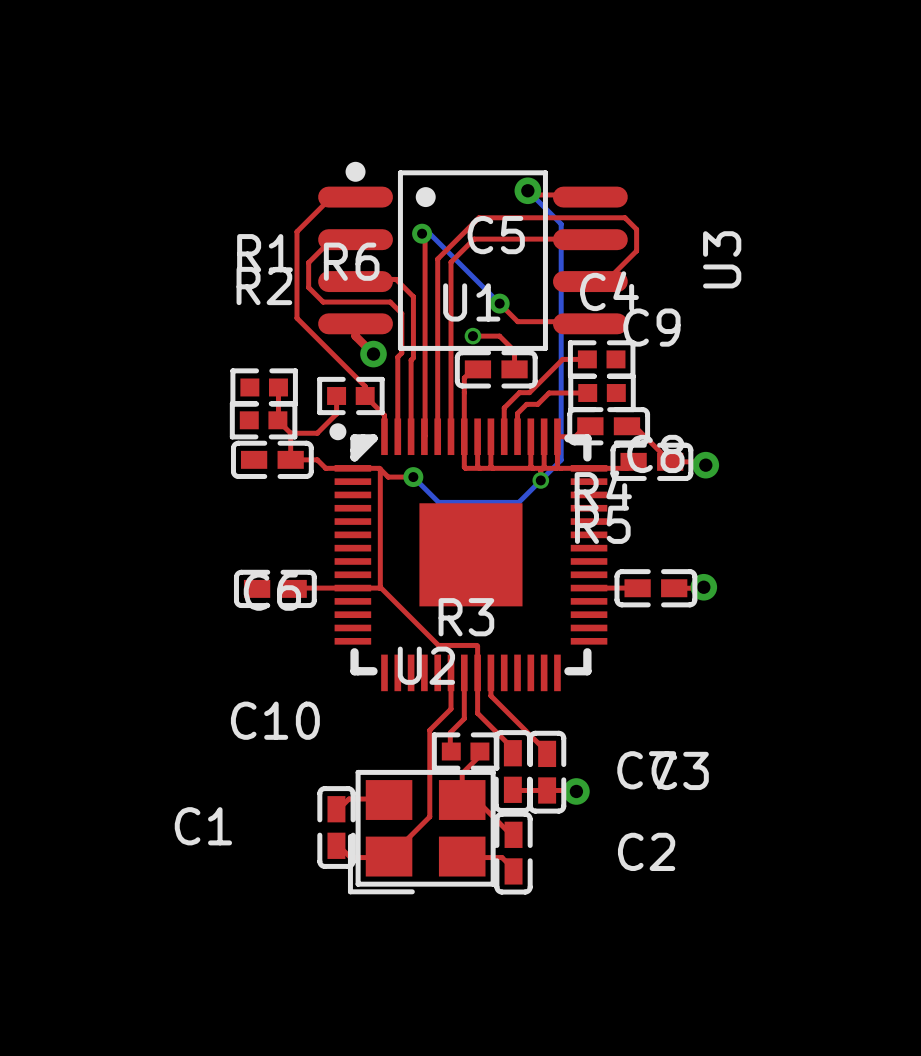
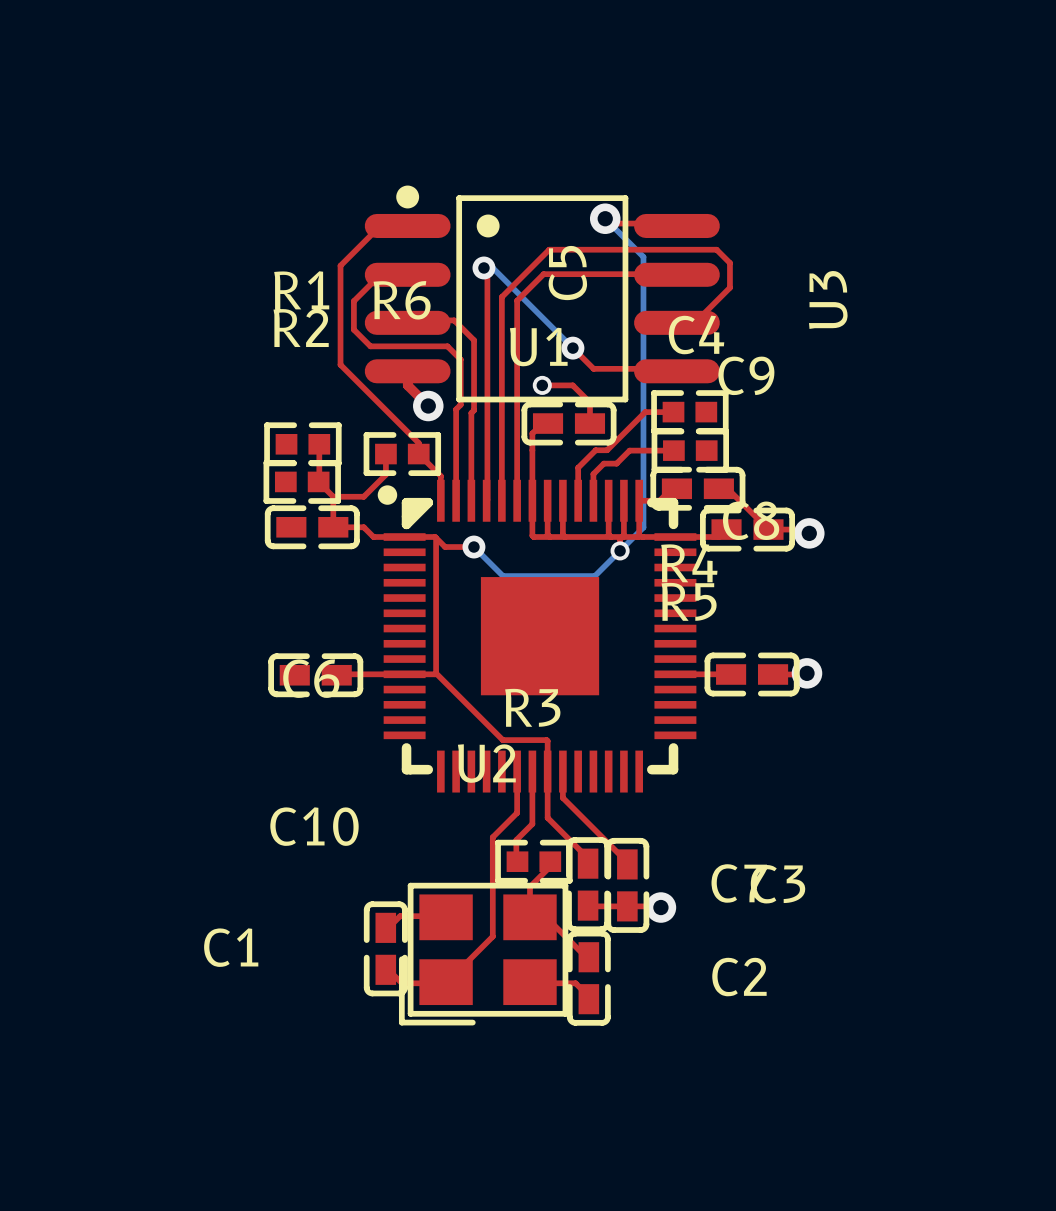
C5 name rotation: 0° (496, 235) -> 90° counterclockwise (567, 273)

